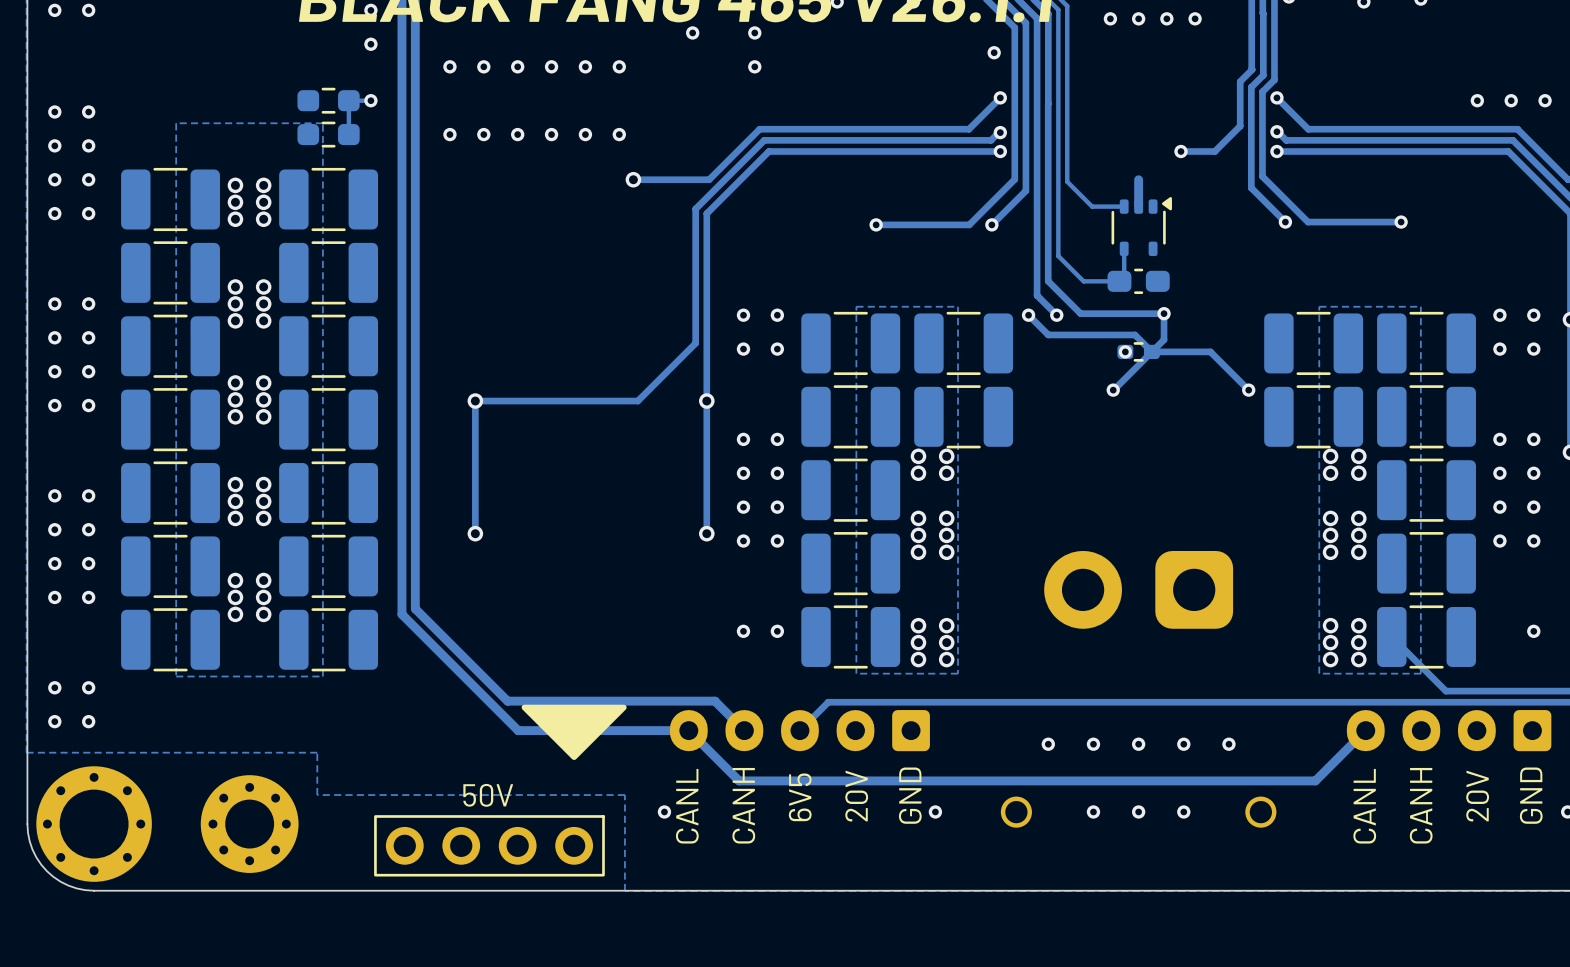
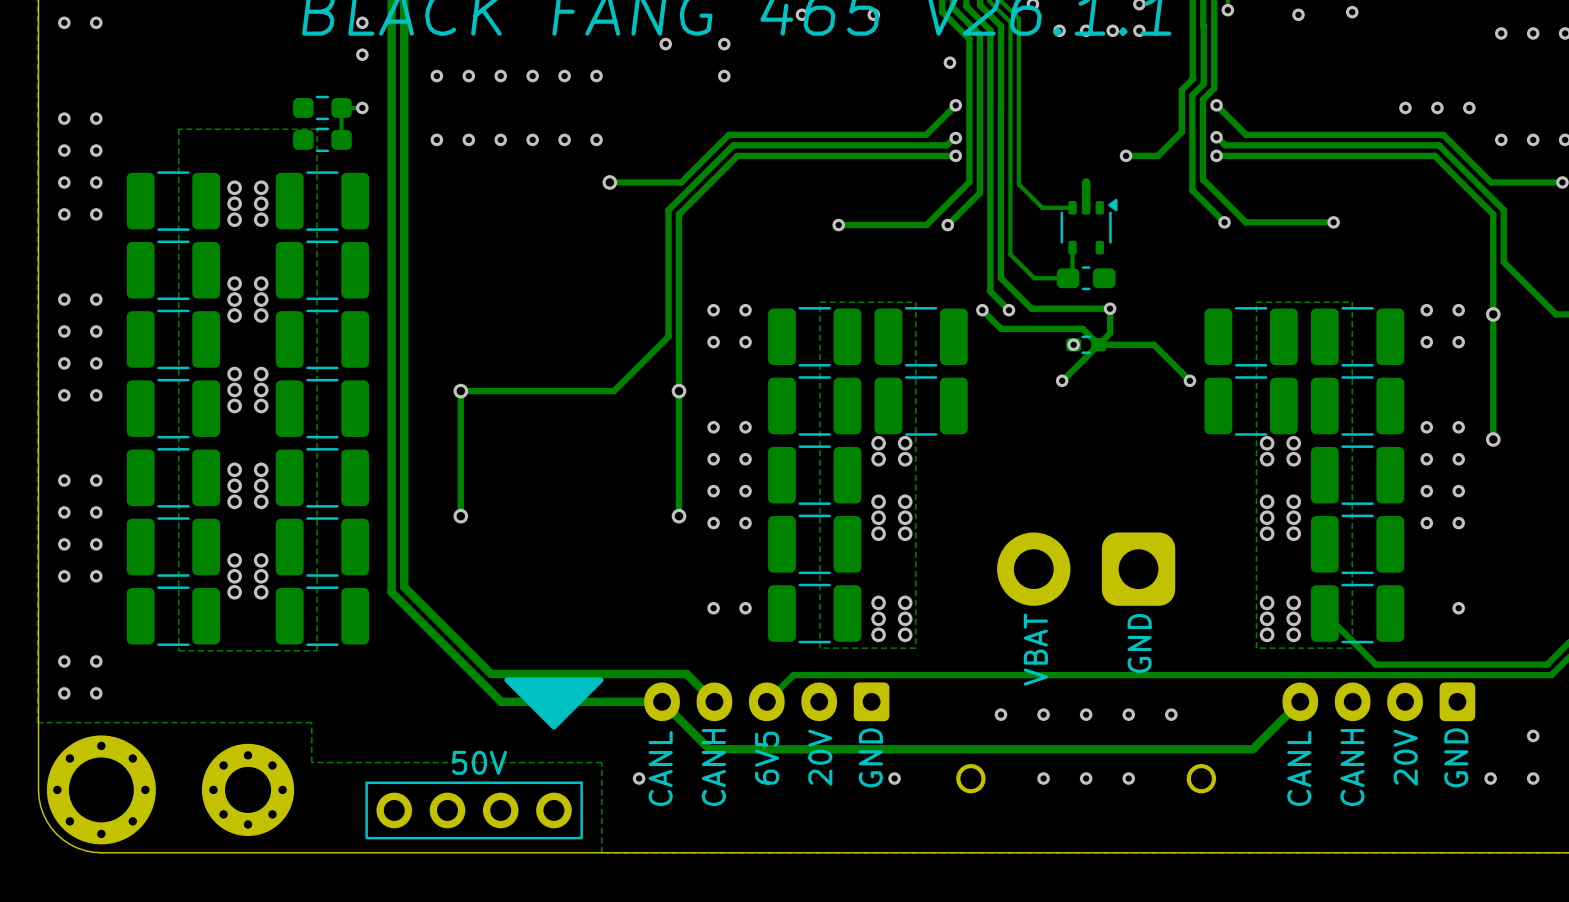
text: none -> GND (1139, 643)
text: none -> VBAT (1035, 649)

